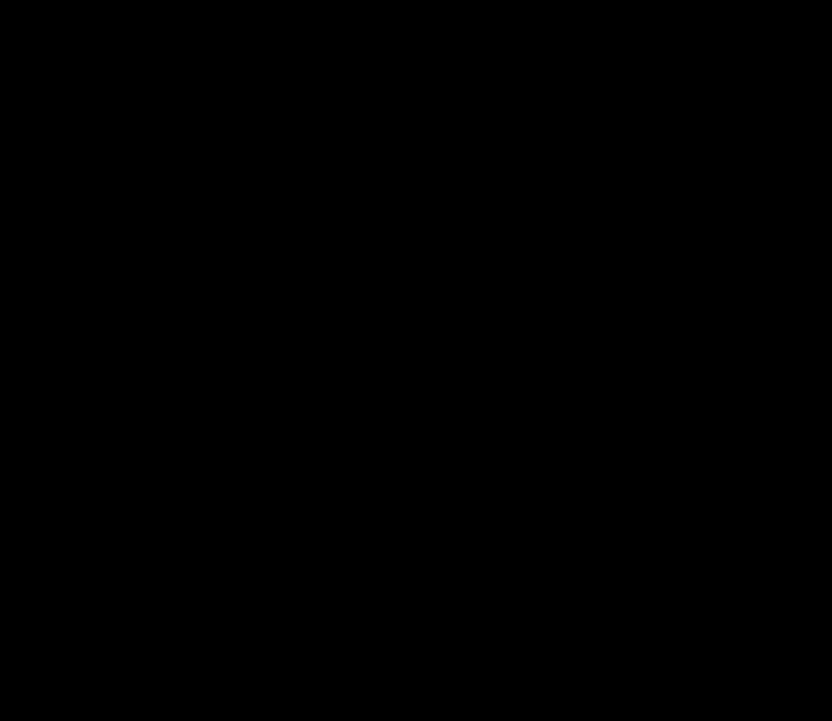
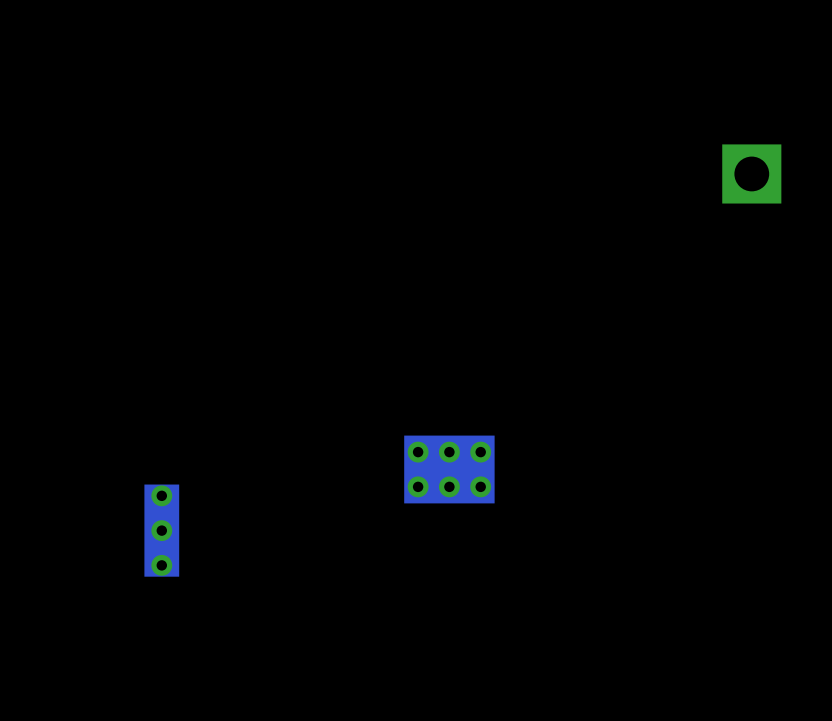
part: none -> (751, 173)
part: none -> (449, 469)
part: none -> (161, 530)

